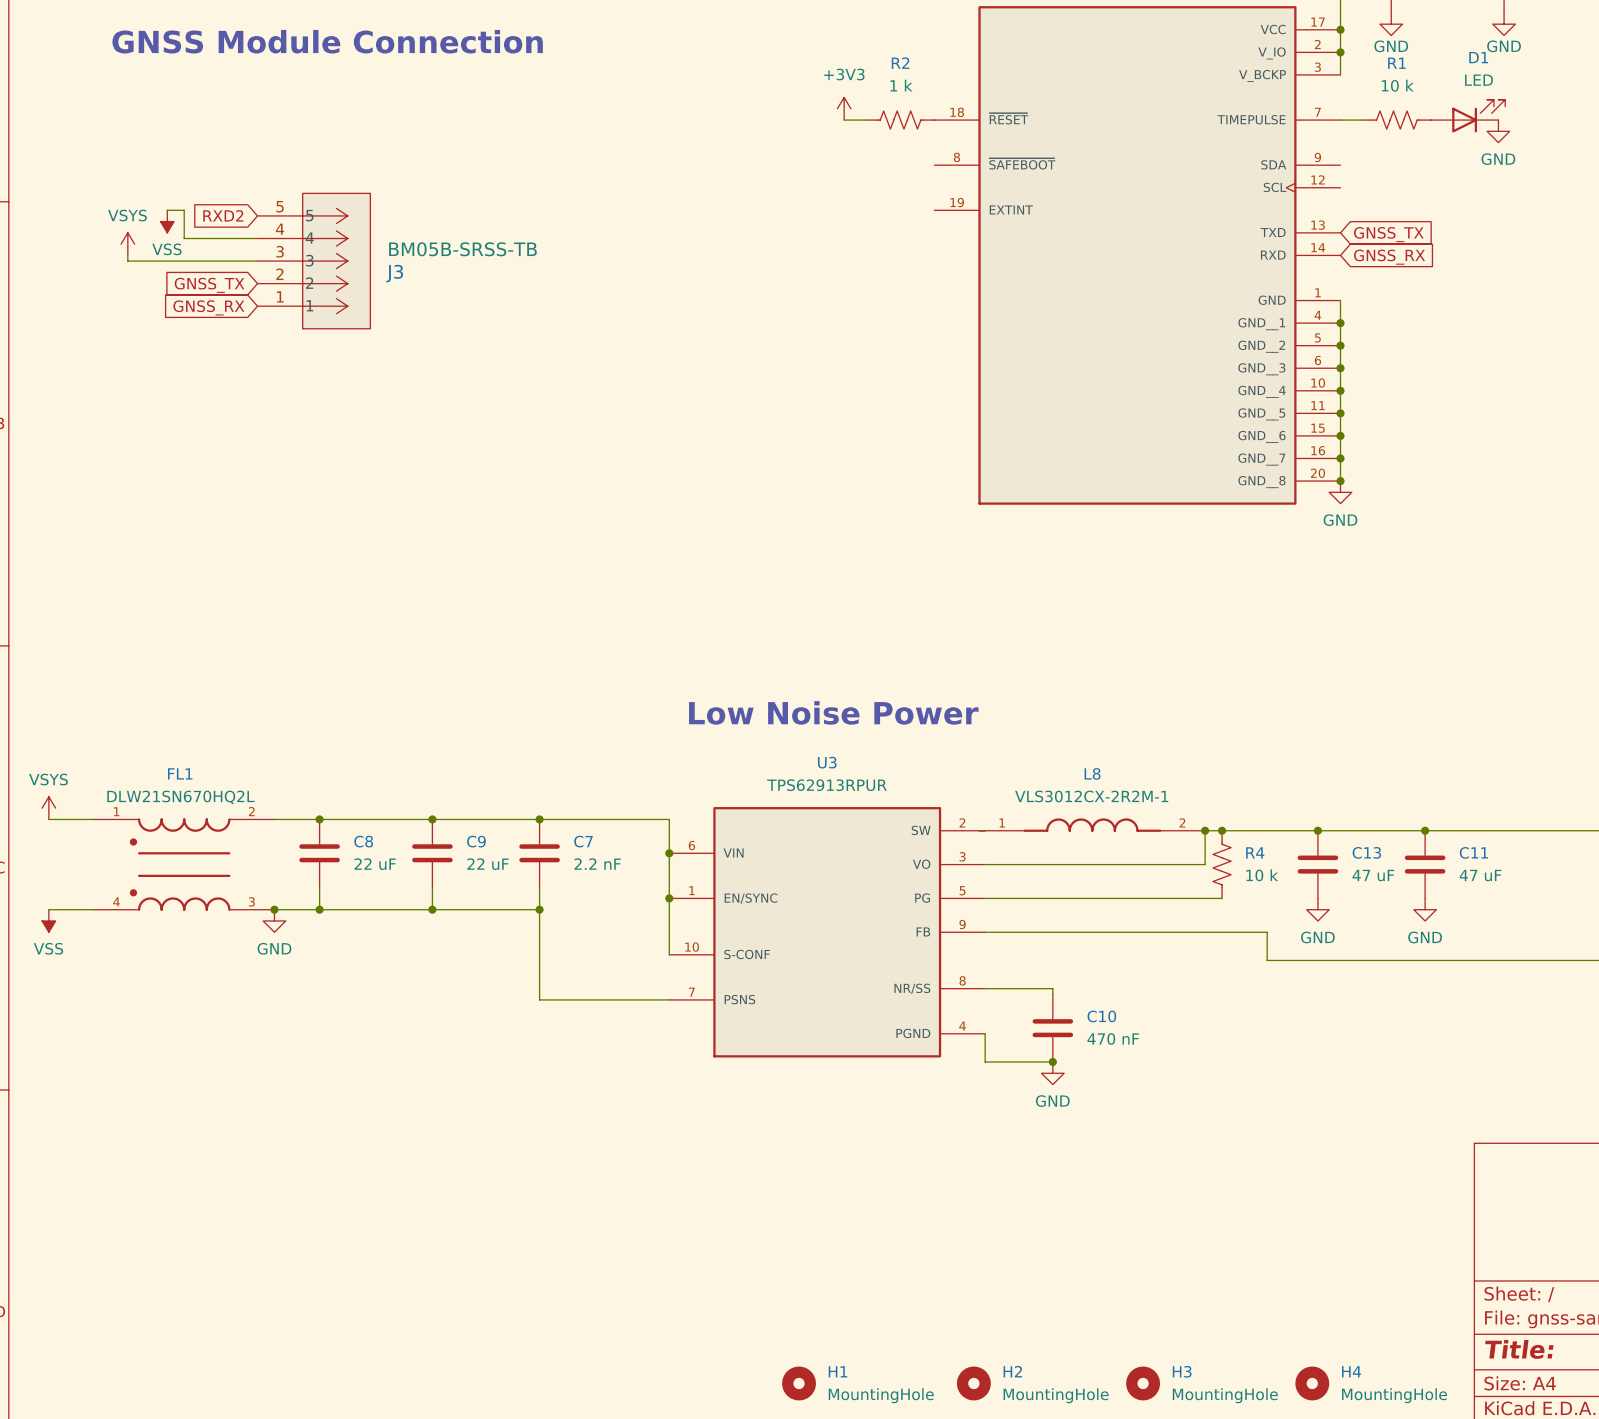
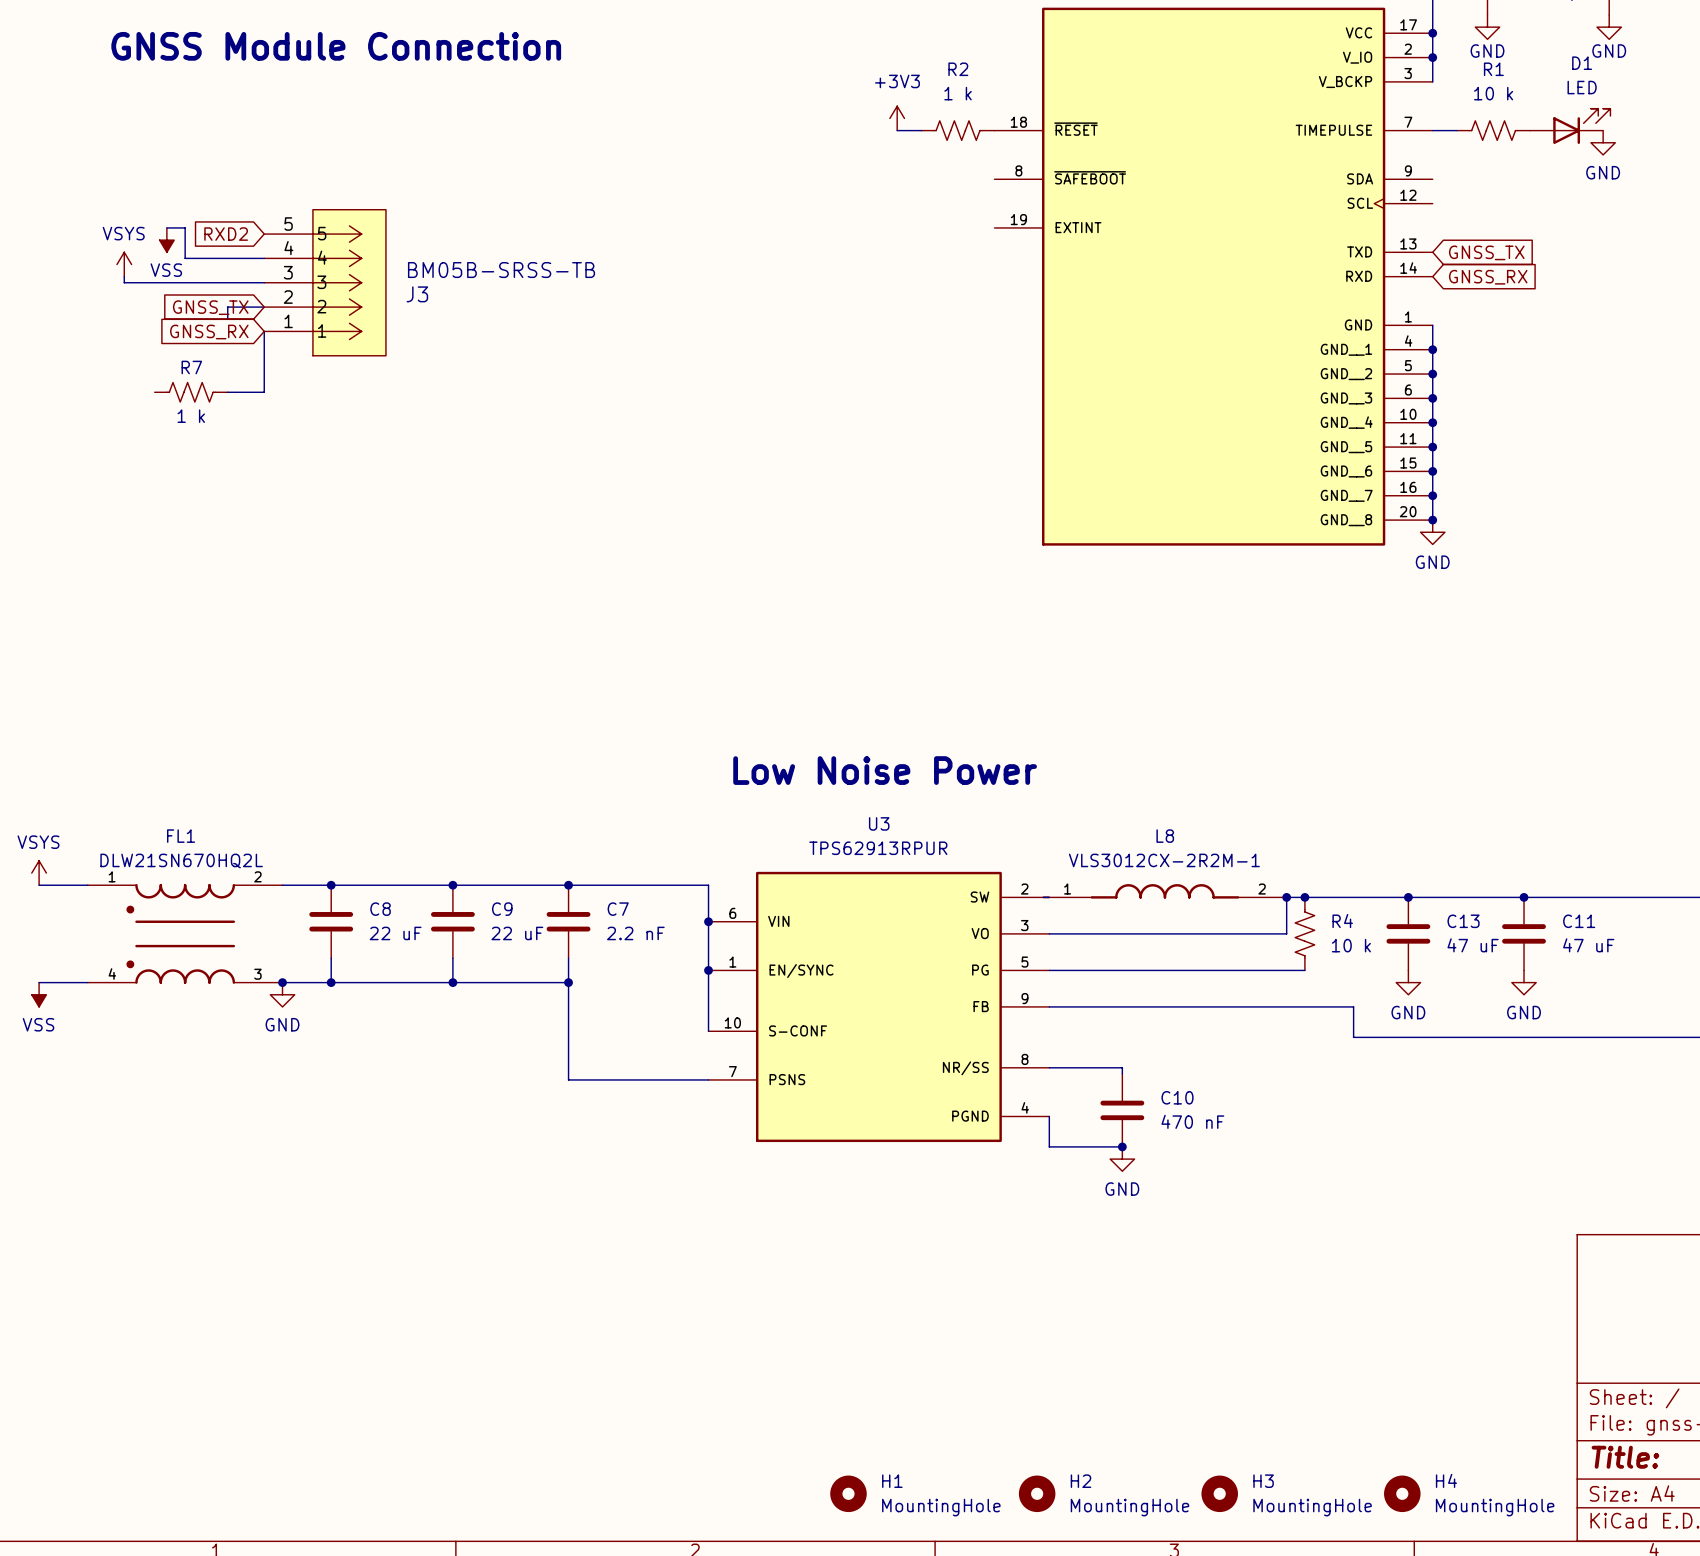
wire: none -> (264, 307) (227, 307) (227, 319)
wire: none -> (264, 331) (264, 392) (227, 392)
R7: none -> 1 k (191, 392)

